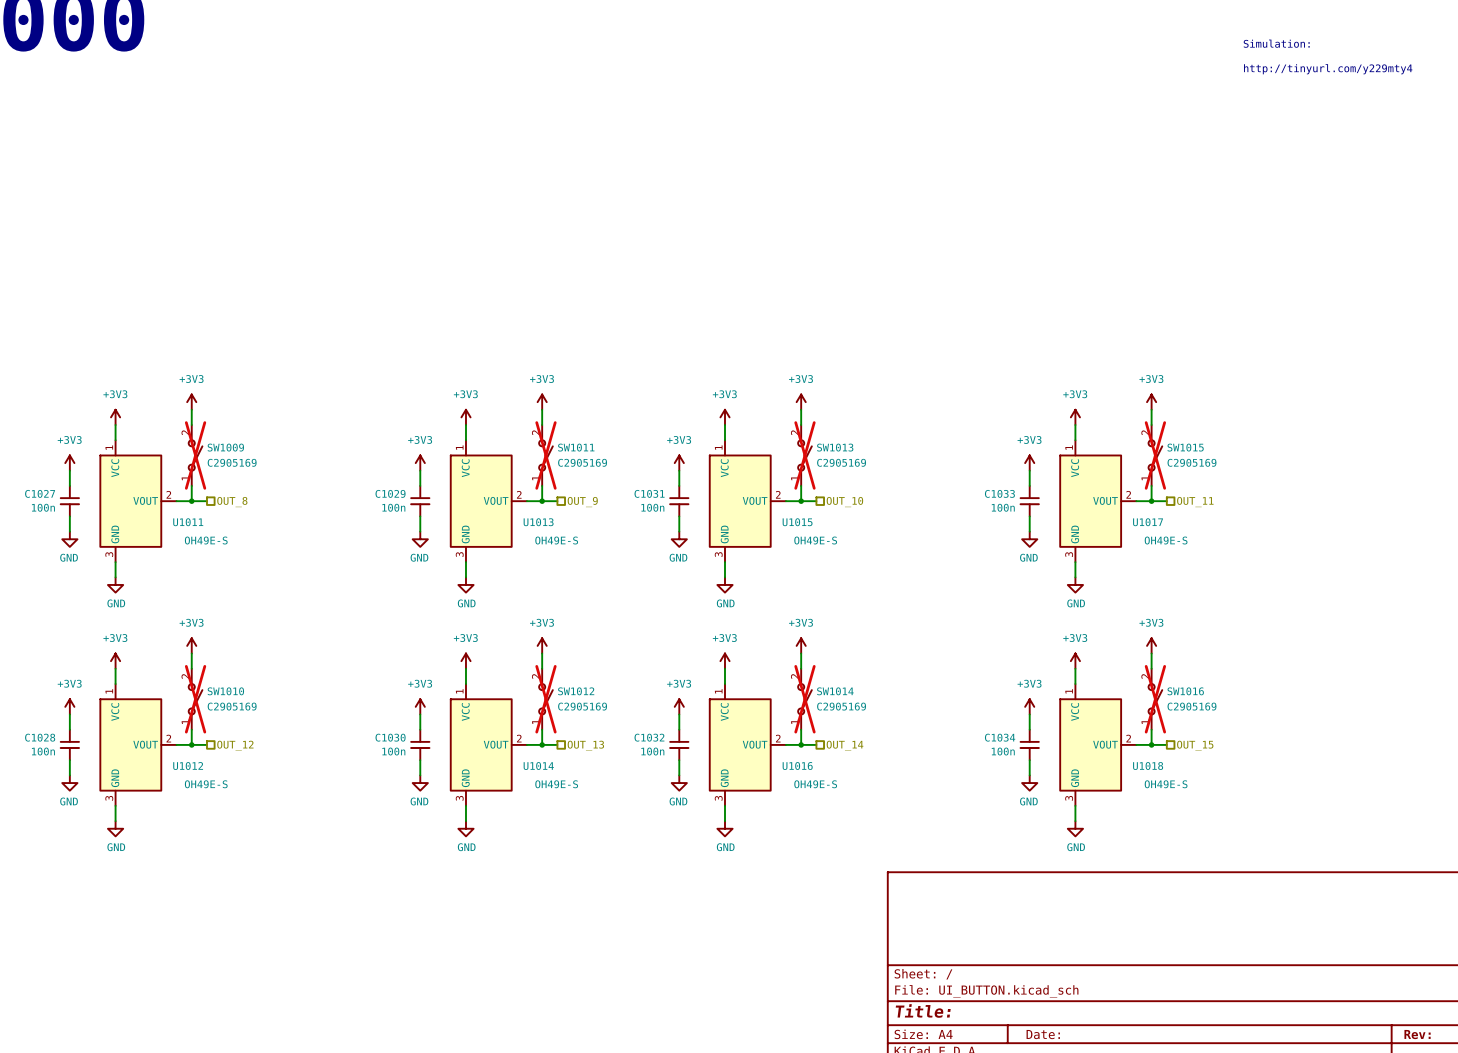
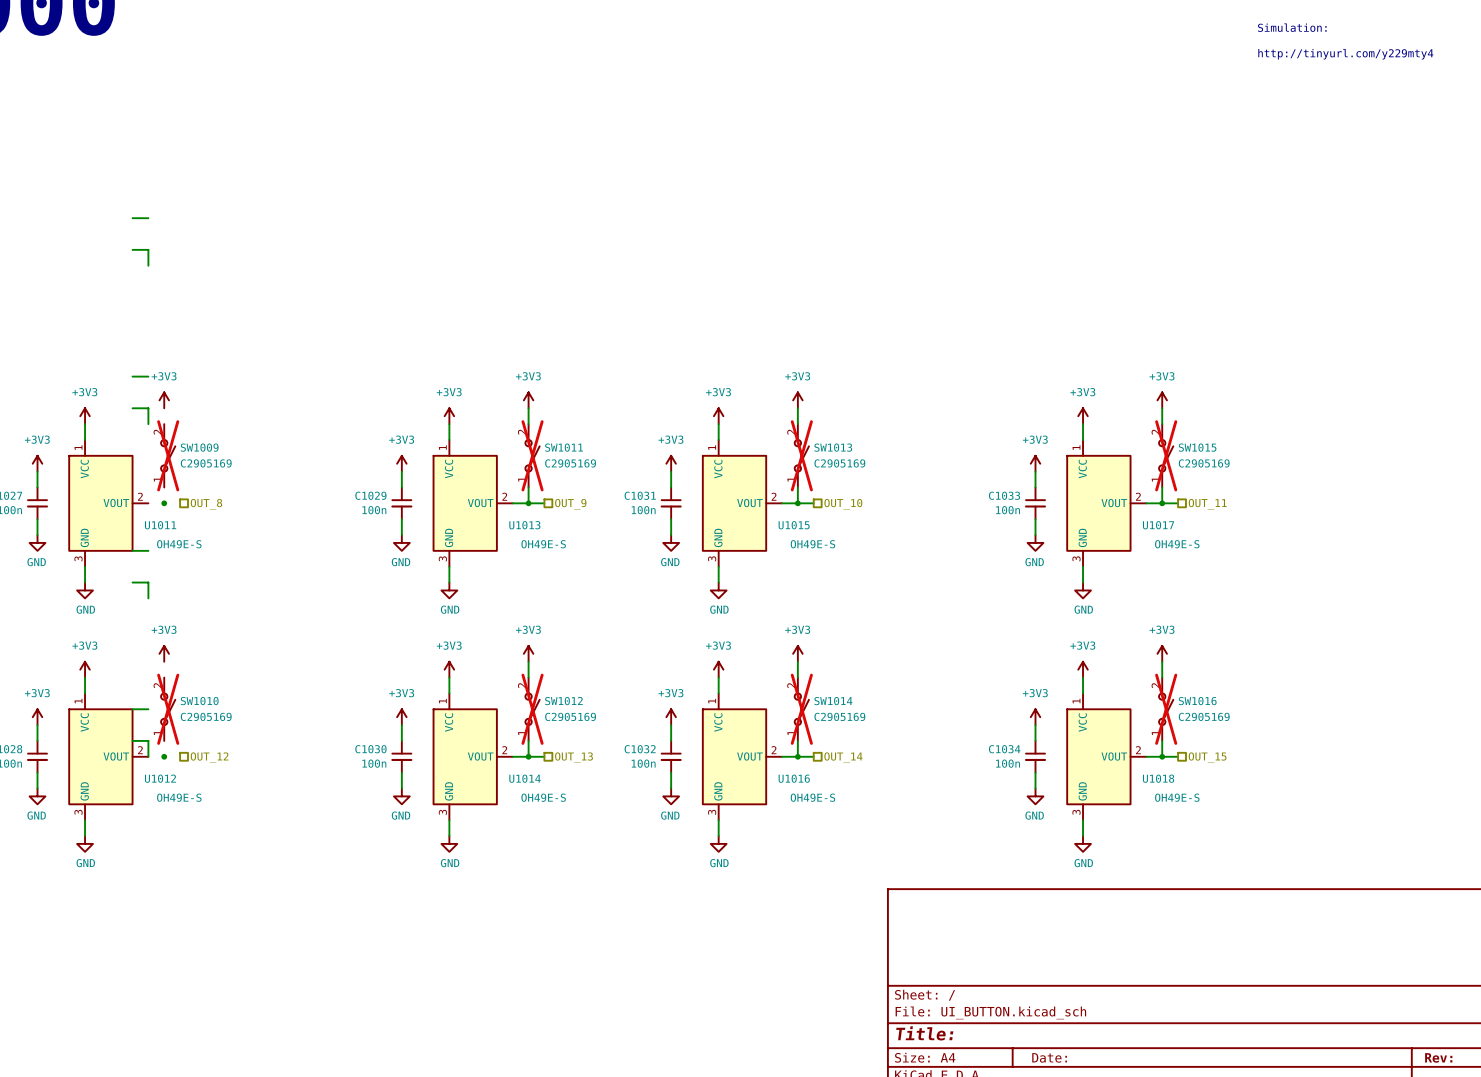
wire: none -> (132, 218) (148, 218)
wire: none -> (132, 249) (148, 249) (148, 265)
wire: none -> (132, 376) (148, 376)
wire: none -> (132, 408) (148, 408) (148, 424)
wire: (191, 409) (191, 425) -> none
wire: (191, 485) (191, 501) -> none
wire: (176, 501) (206, 501) -> none
wire: none -> (132, 550) (148, 550)
wire: none -> (132, 582) (148, 582) (148, 598)
wire: (191, 653) (191, 668) -> none
wire: none -> (132, 709) (148, 709)
wire: (191, 729) (191, 744) -> none
wire: (176, 744) (206, 744) -> (148, 756) (148, 740) (132, 740)

